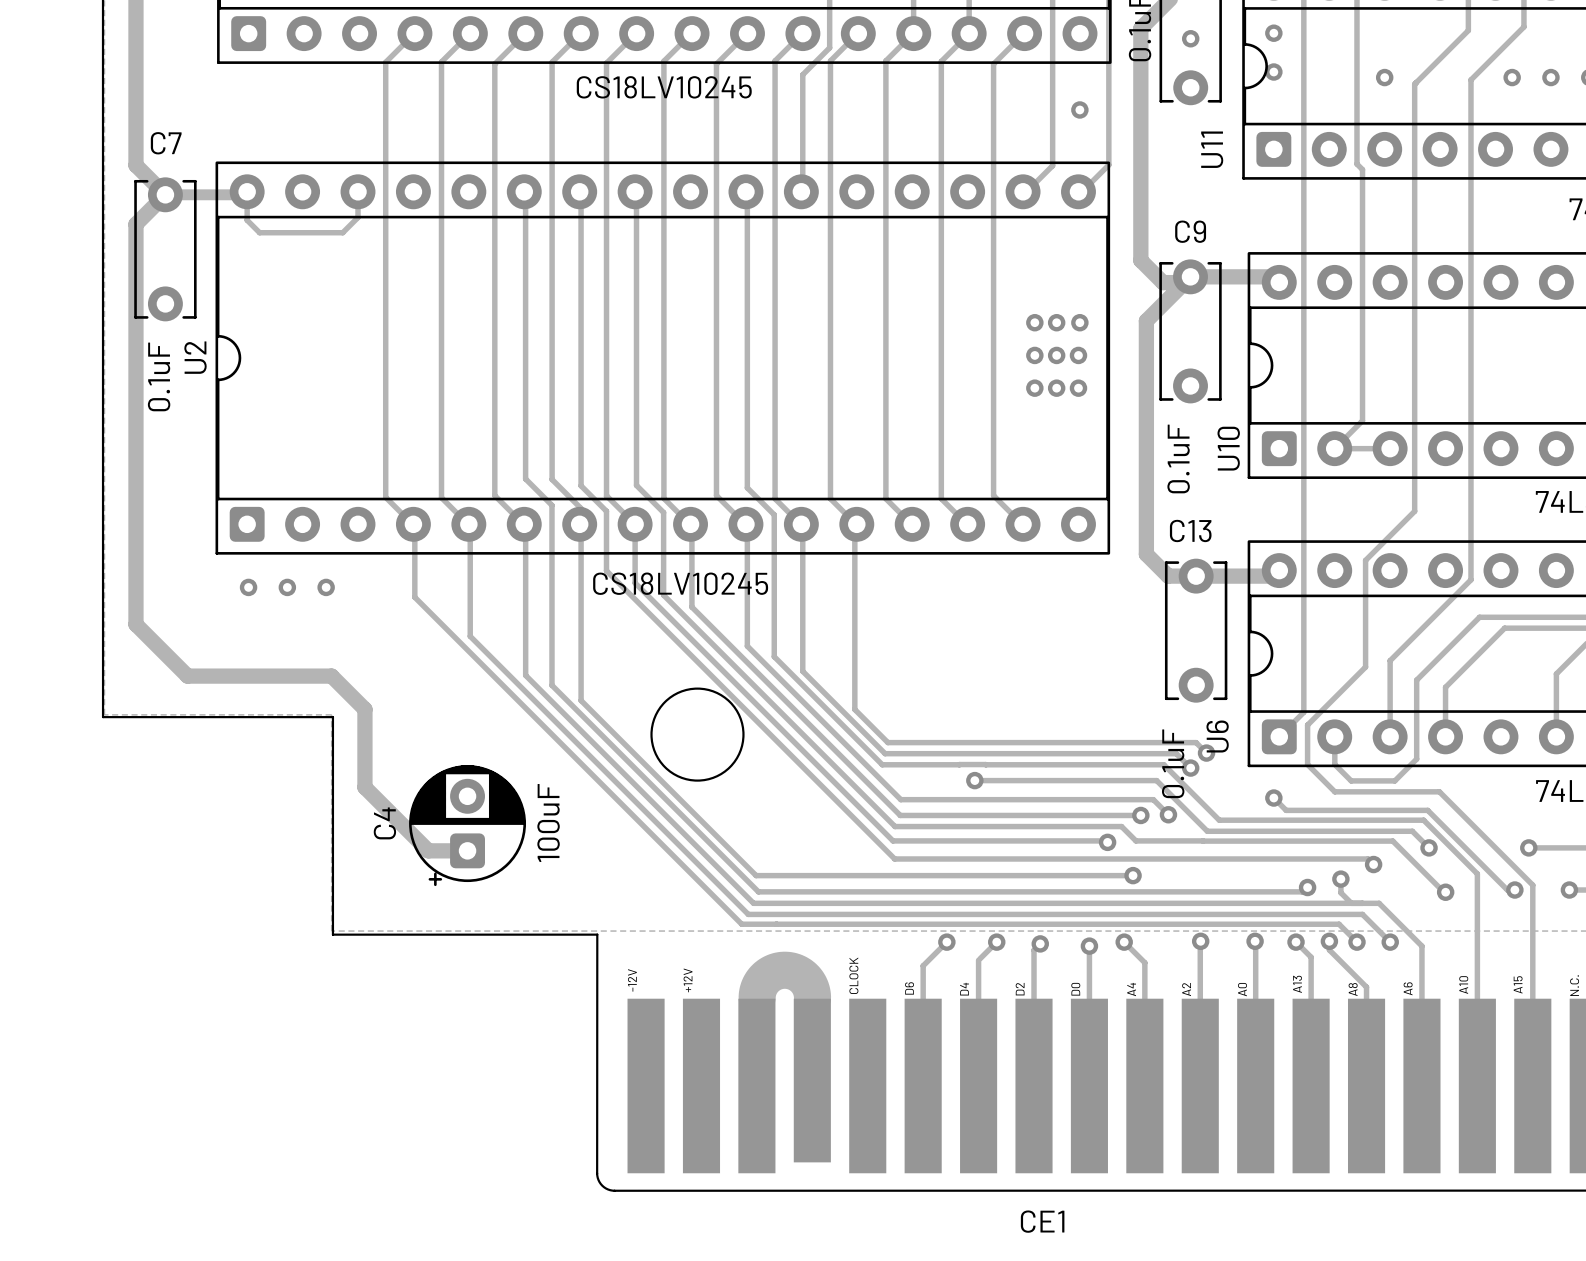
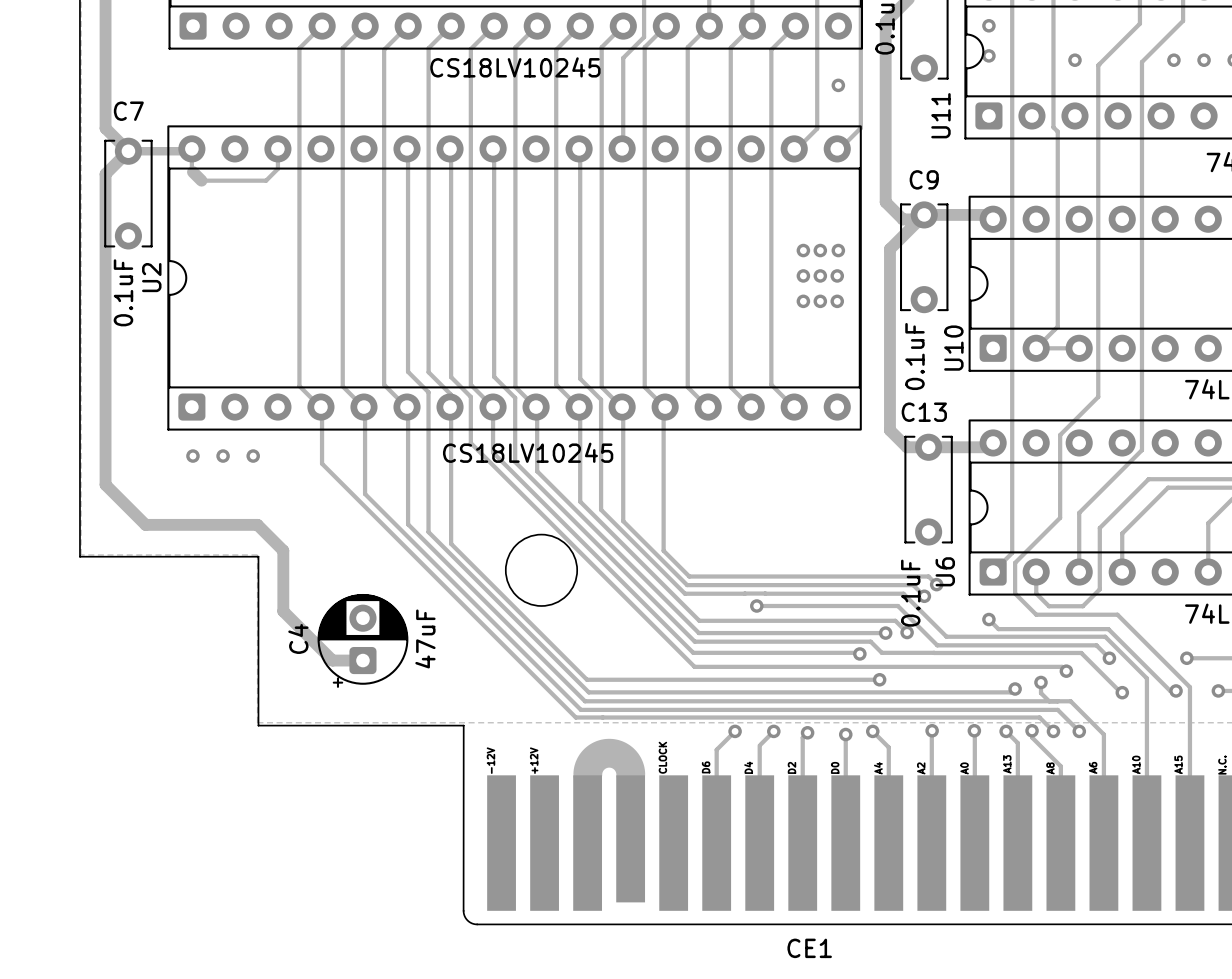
via: (1190, 38) -> none
track width: thin (248, 221) (259, 232) -> thick (192, 172) (201, 180)
C4 value: 100uF (548, 823) -> 47uF (425, 638)

